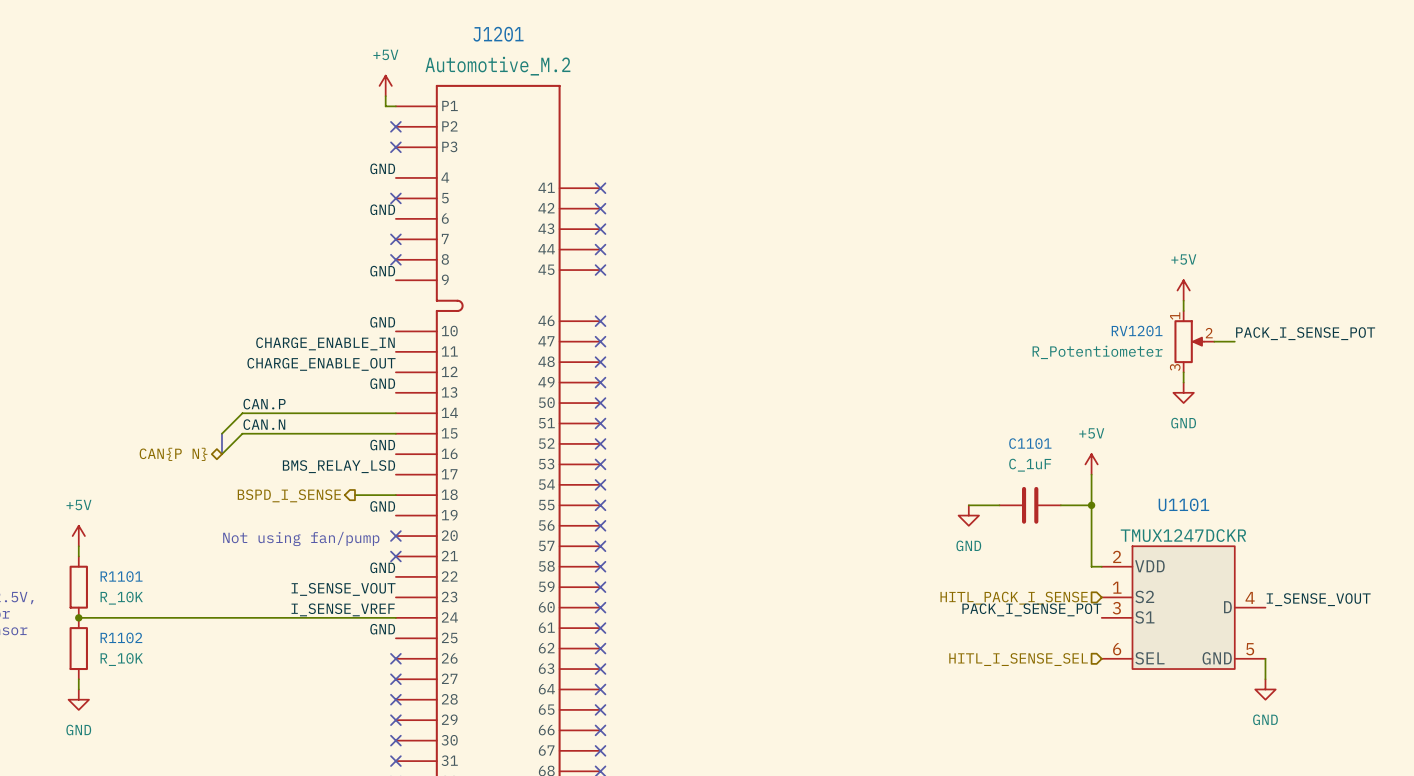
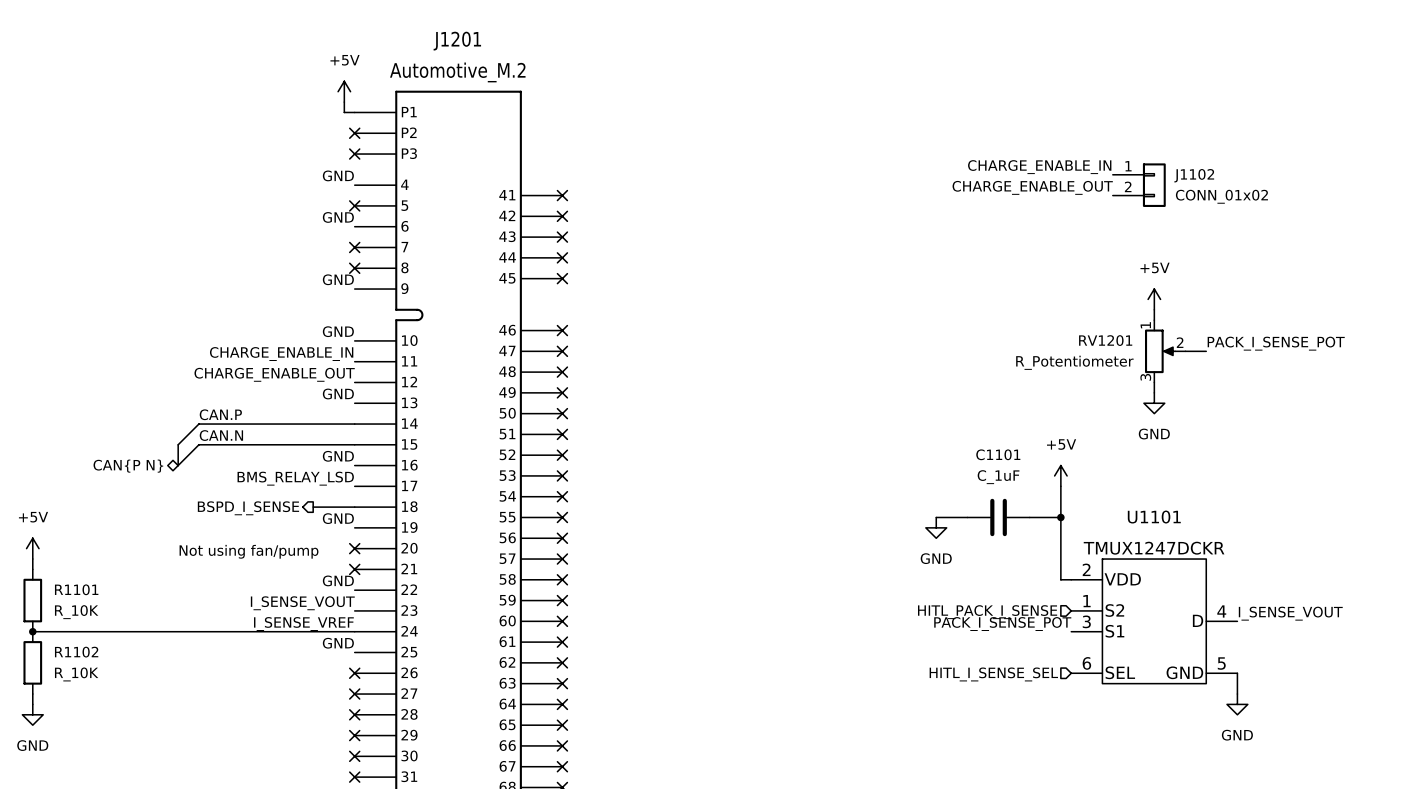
label: none -> CHARGE_ENABLE_IN (1039, 167)
J1102: none -> CONN_01x02 (1139, 185)
label: none -> CHARGE_ENABLE_OUT (1032, 187)

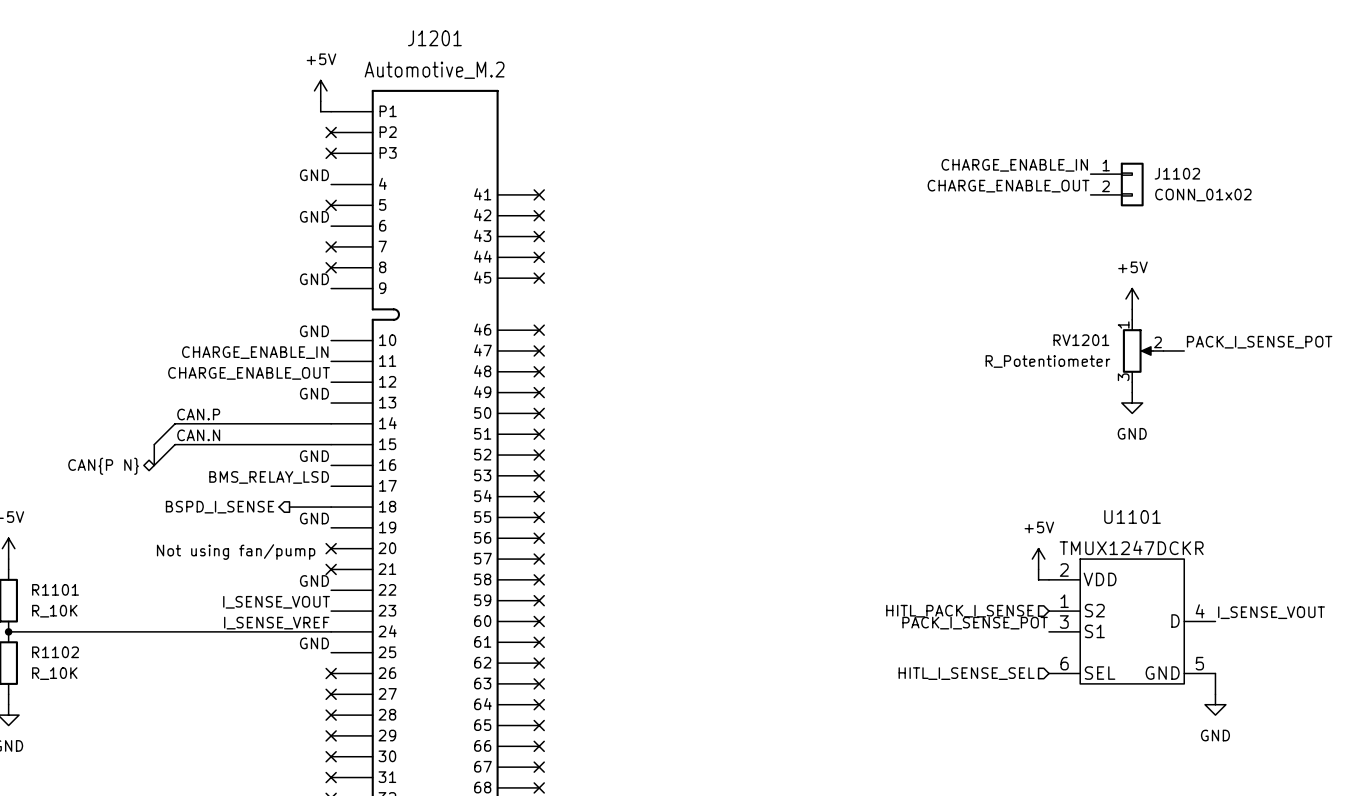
power symbol position: +5V (1060, 475) -> +5V (1038, 559)
wire: (1060, 486) (1060, 569) -> none
wire: (936, 517) (967, 517) -> none
C1101: C_1uF (998, 517) -> none
wire: (1029, 517) (1060, 517) -> none
junction: (1060, 517) -> none
power symbol: GND (936, 527) -> none

